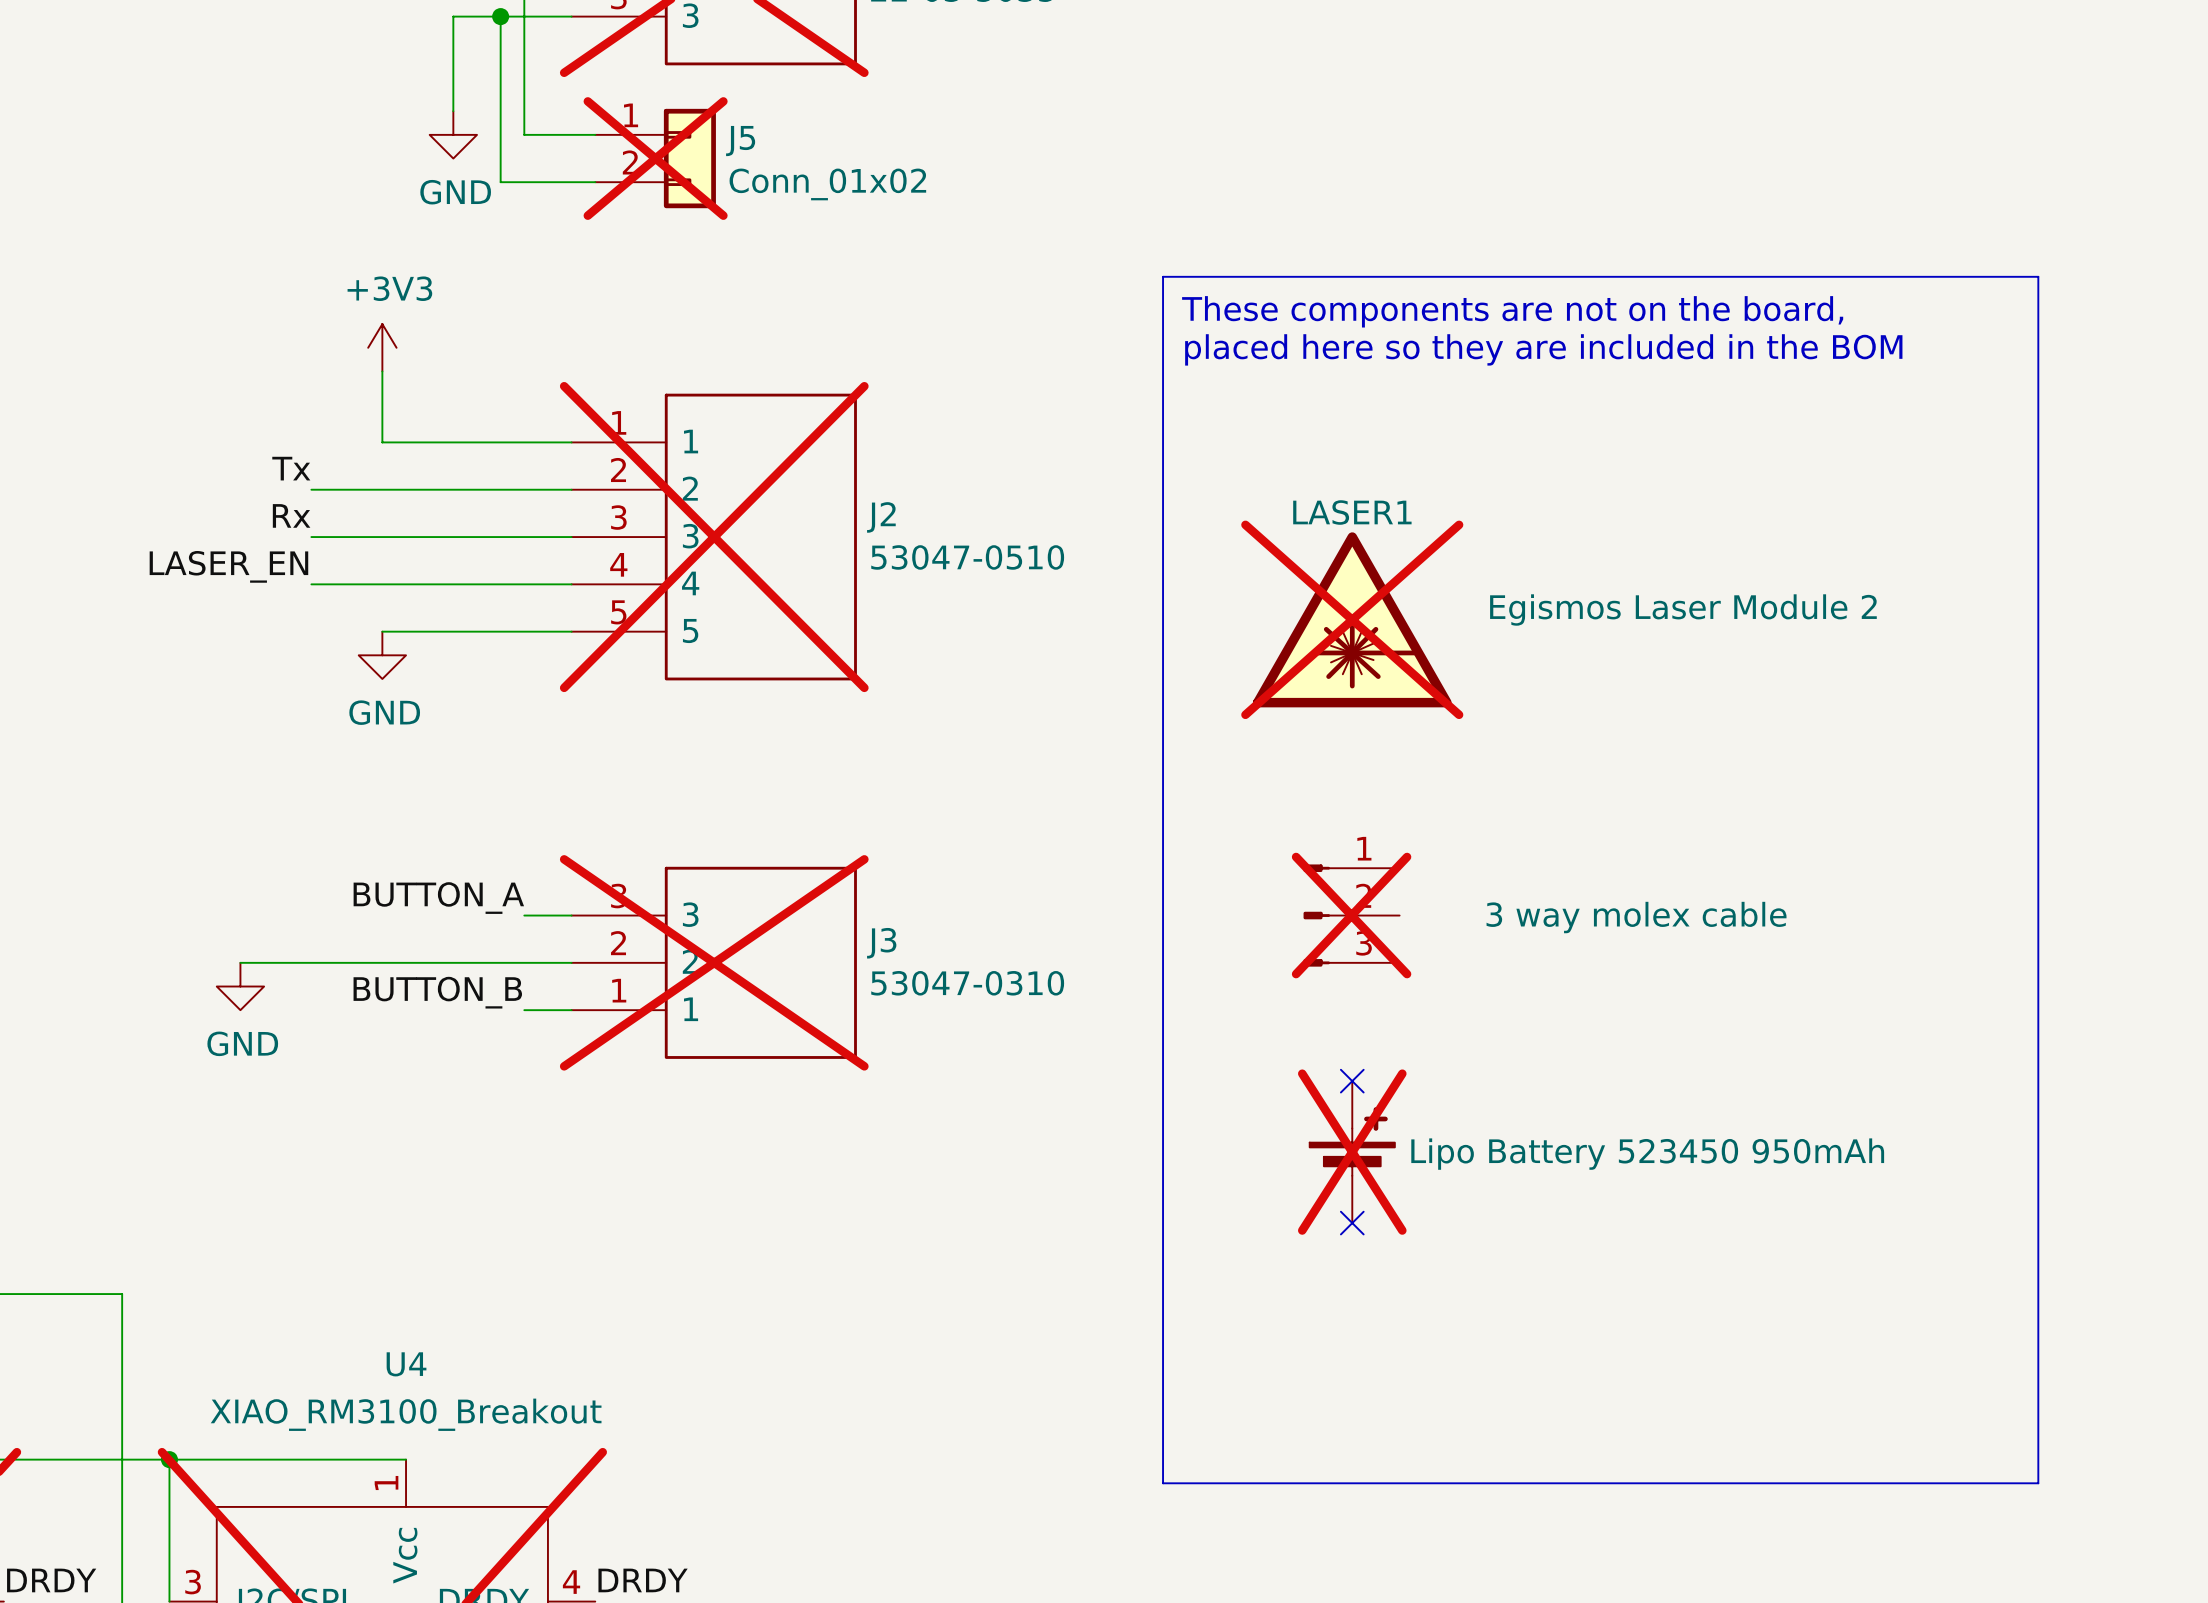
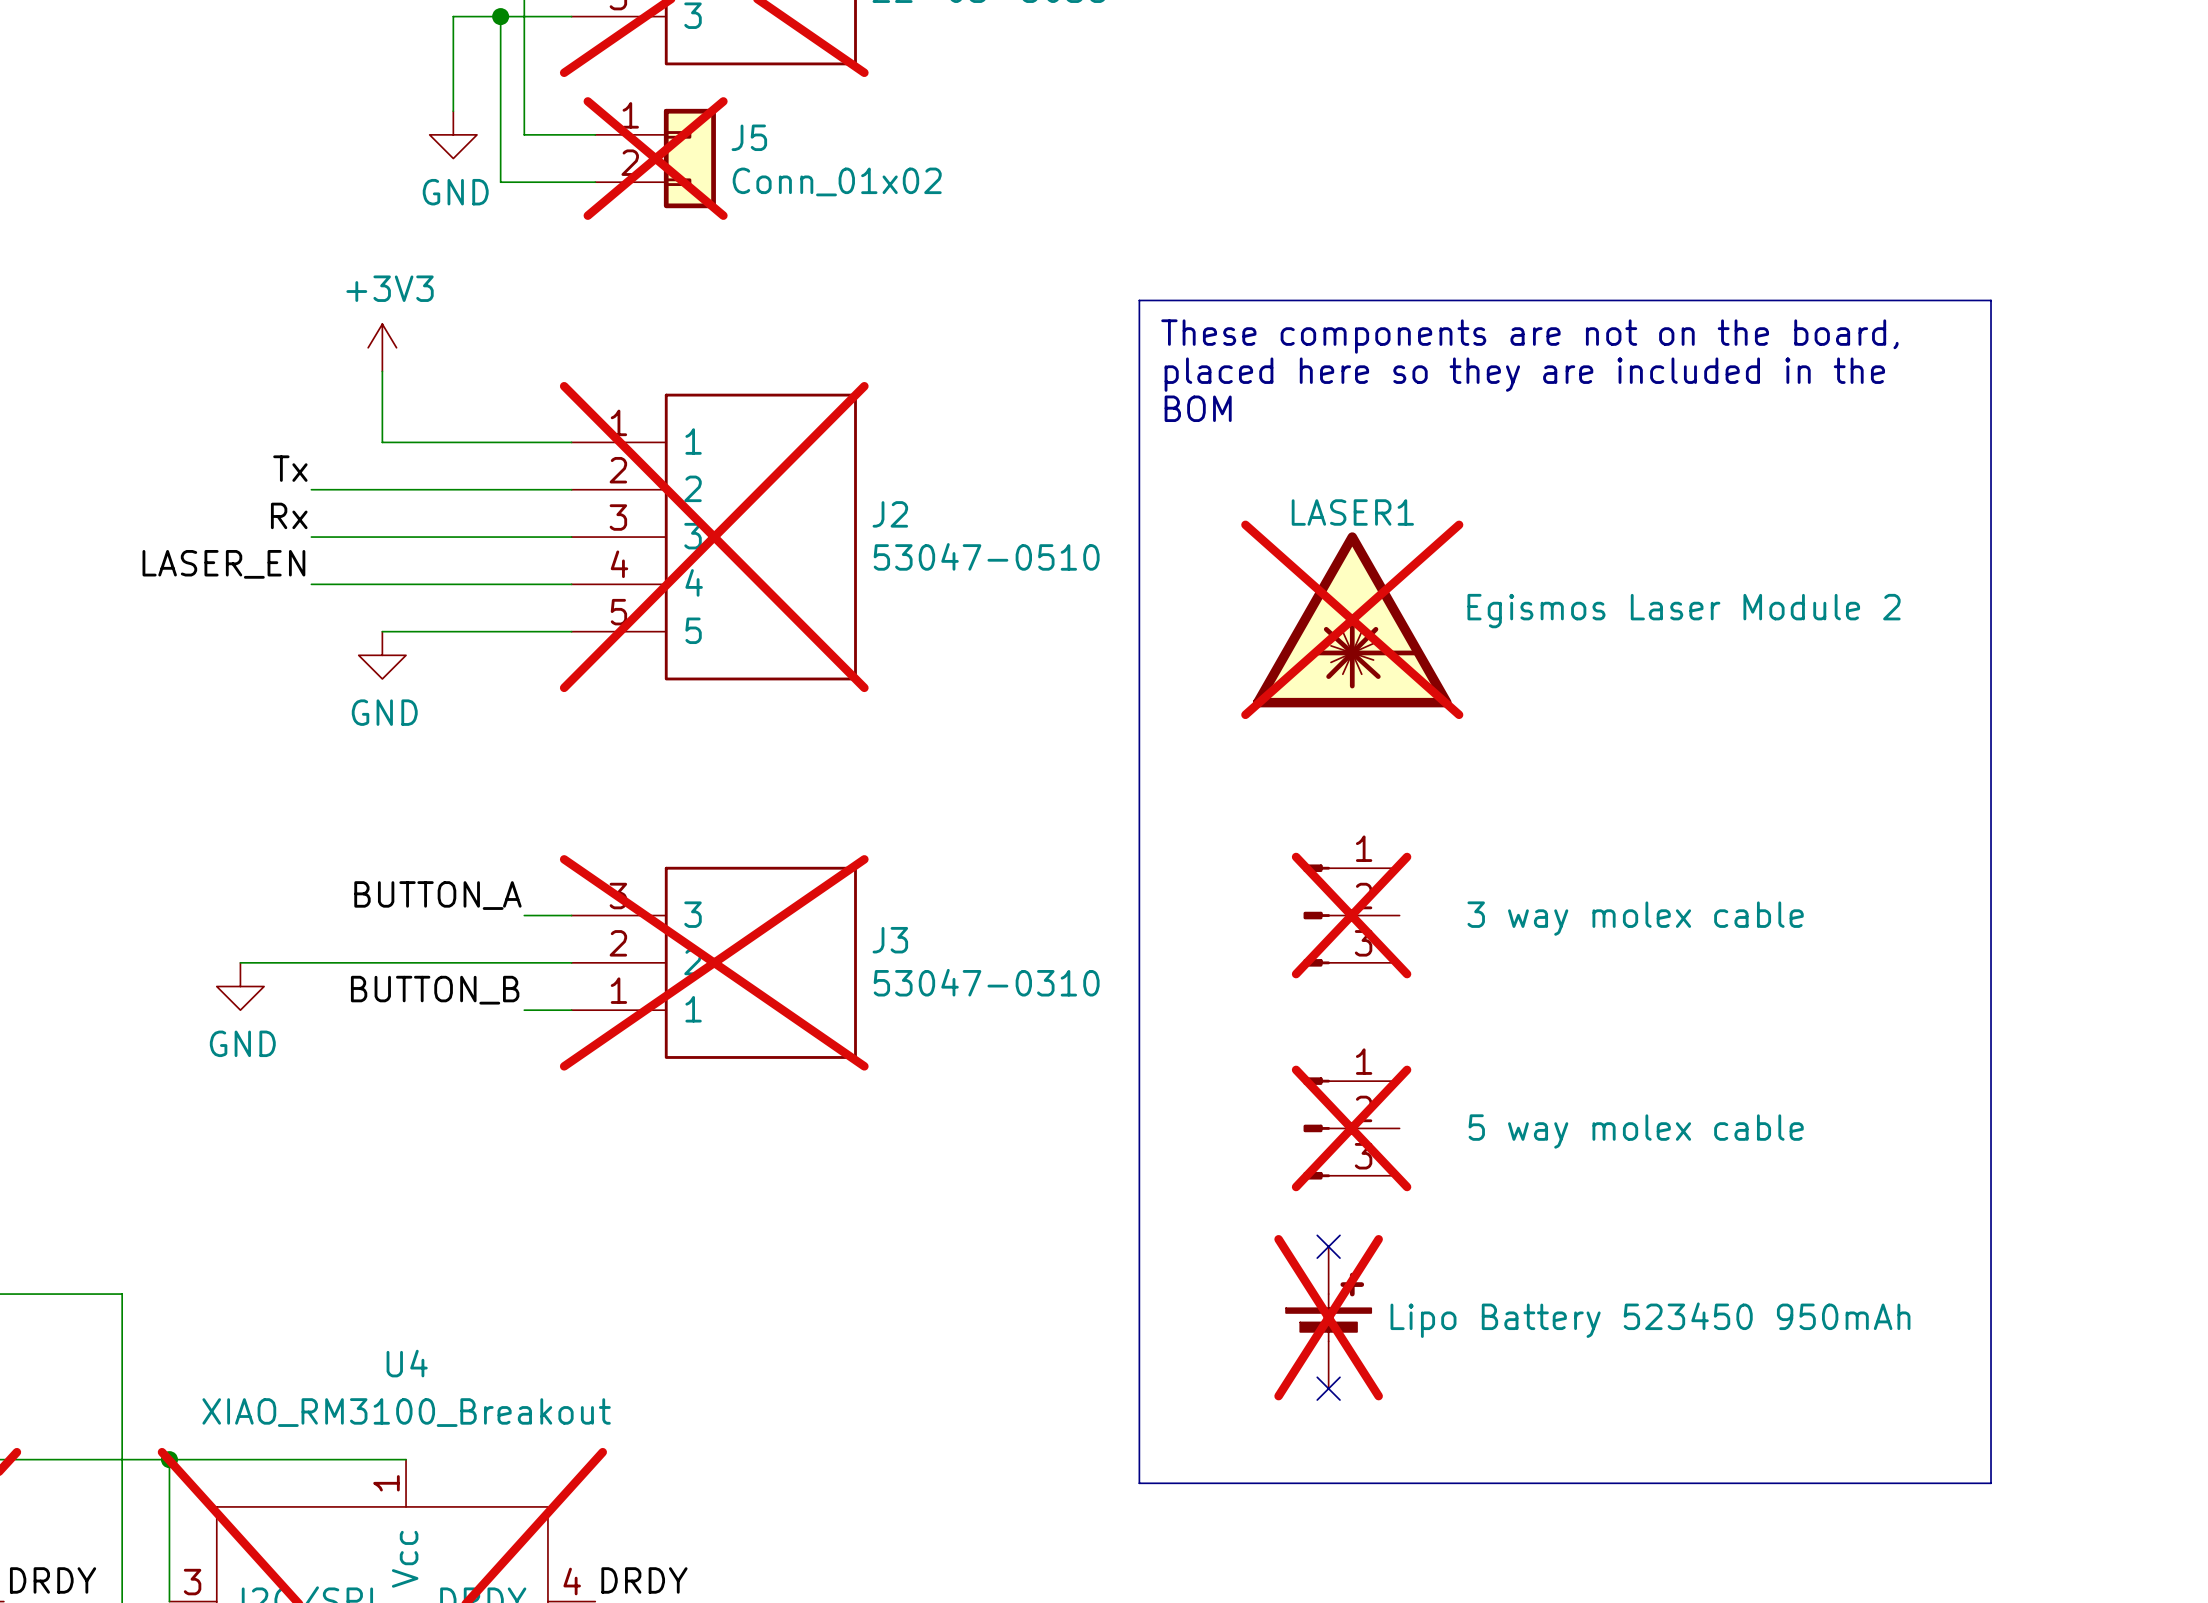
text position: These components are not on the board, (1512, 311) -> These components are not on the board, (1529, 336)
text: placed here so they are included in the BOM (1543, 349) -> placed here so they are included in the (1524, 374)
text: none -> BOM (1198, 408)
no-connect mark: (1352, 1081) -> none
part: none -> 5 way molex cable (1351, 1128)
part position: (1352, 1152) -> (1328, 1317)
no-connect mark position: (1352, 1223) -> (1328, 1246)
no-connect mark: none -> (1328, 1388)
line: (1163, 1483) (1163, 276) (2038, 276) (2038, 1483) (1991, 1483) -> (1163, 1483) (1139, 1483) (1139, 300) (1991, 300) (1991, 1483)

